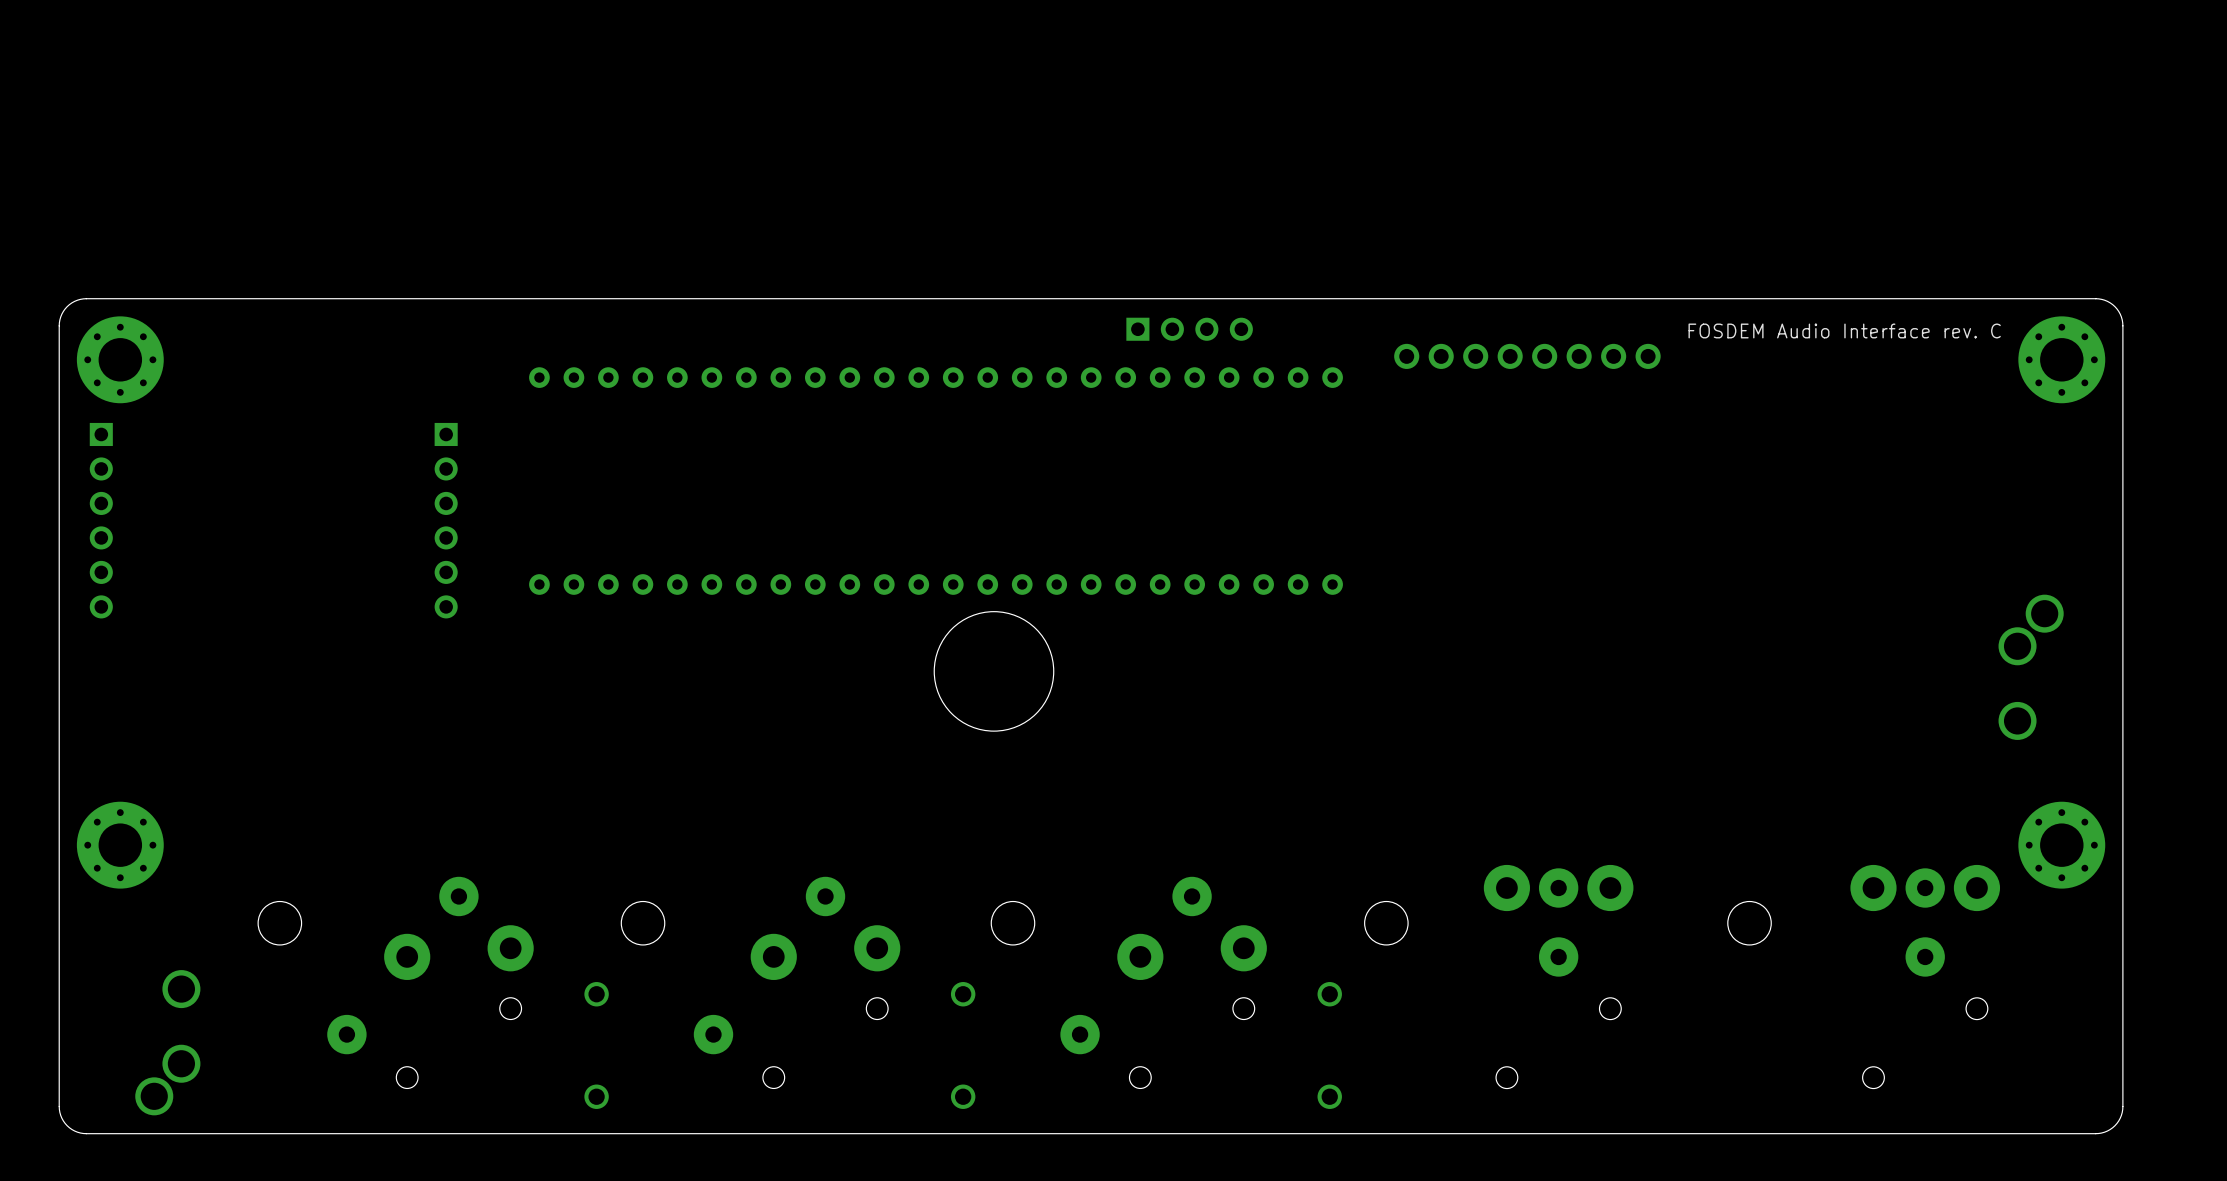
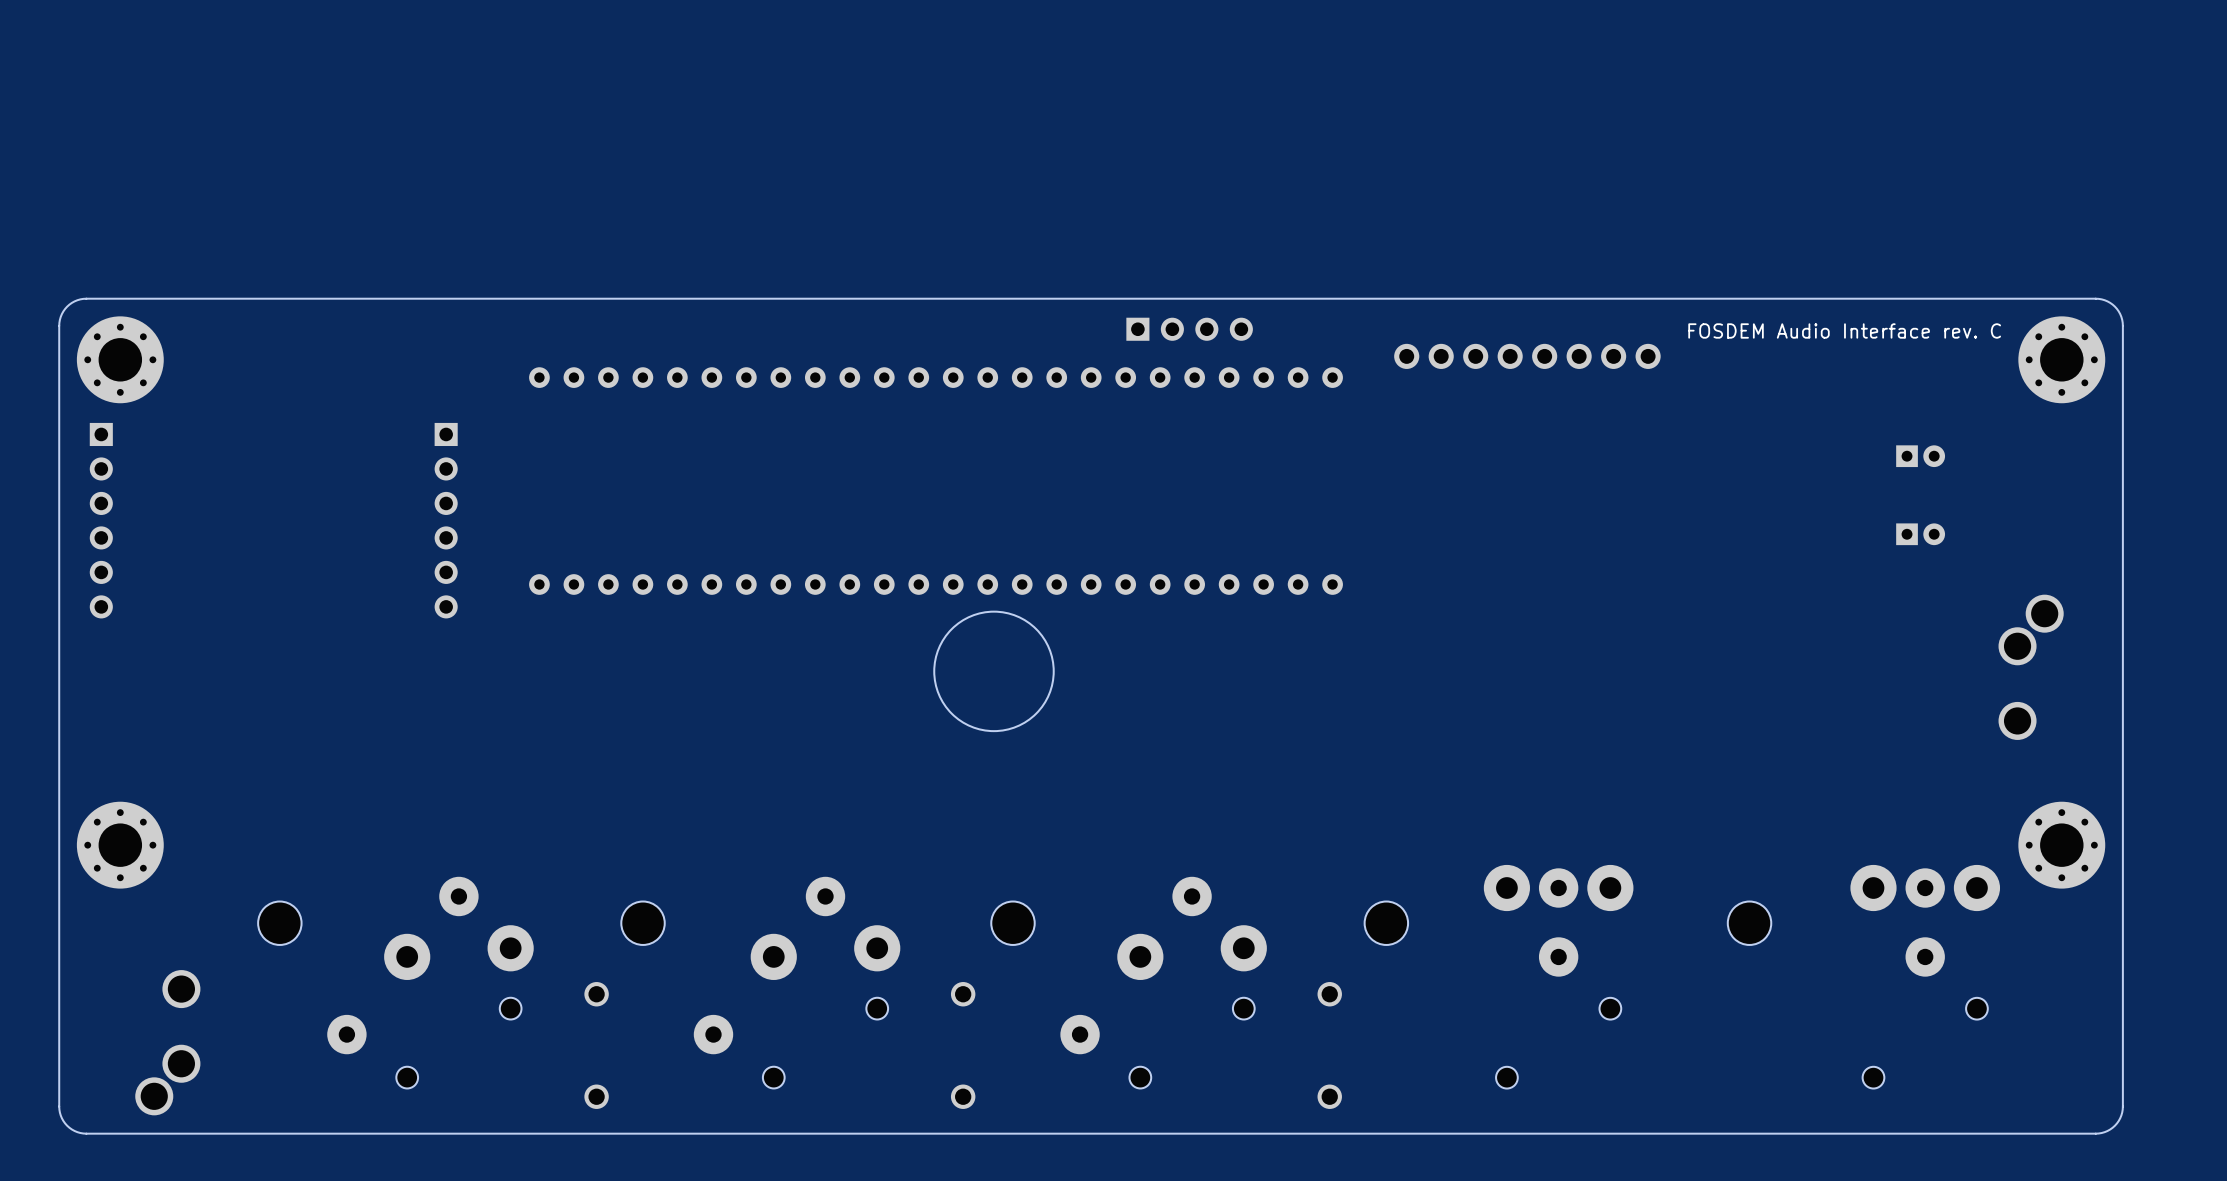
part: none -> (1920, 456)
part: none -> (1920, 534)

